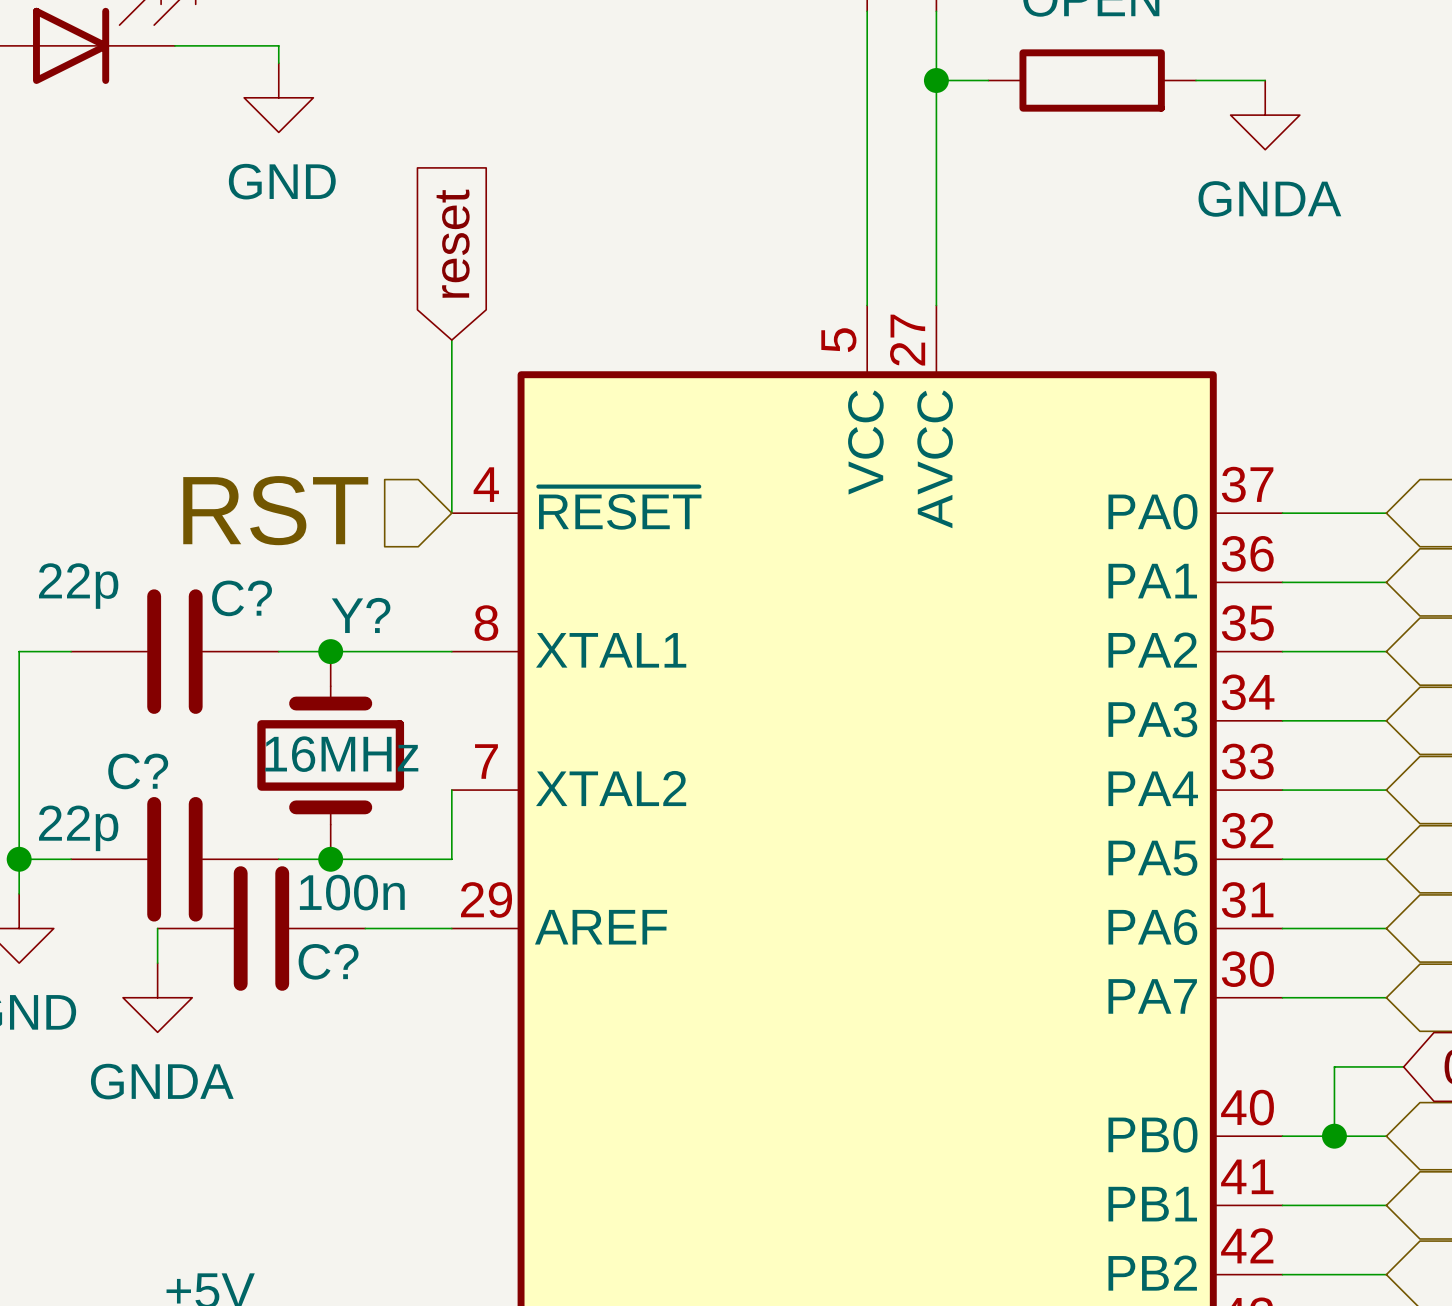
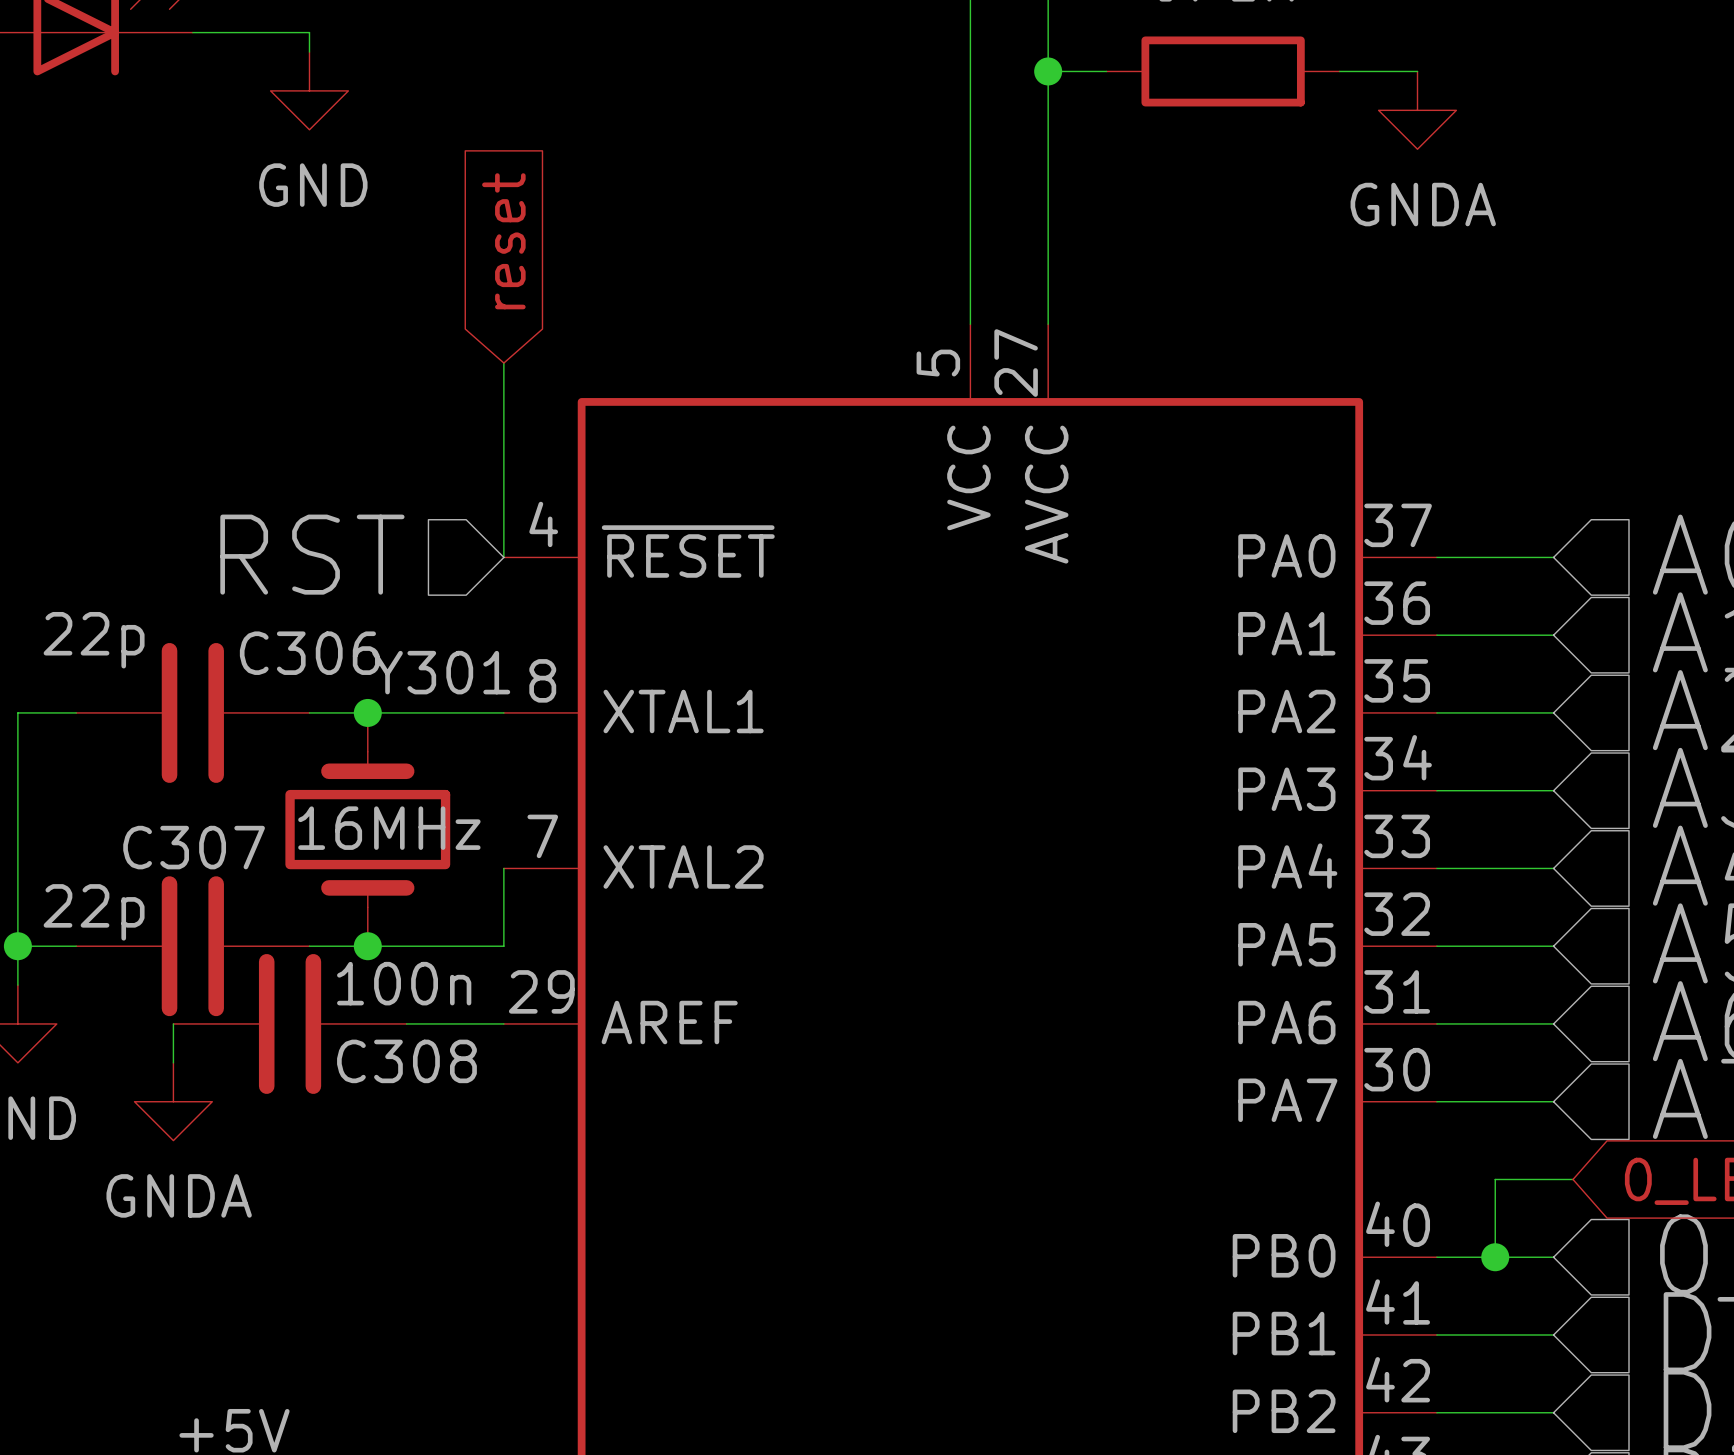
C? name: C? (242, 598) -> C306 (309, 653)
Y? name: Y? (361, 615) -> Y301 (441, 672)
C? name: C? (138, 771) -> C307 (194, 847)
C? name: C? (328, 961) -> C308 (406, 1061)

